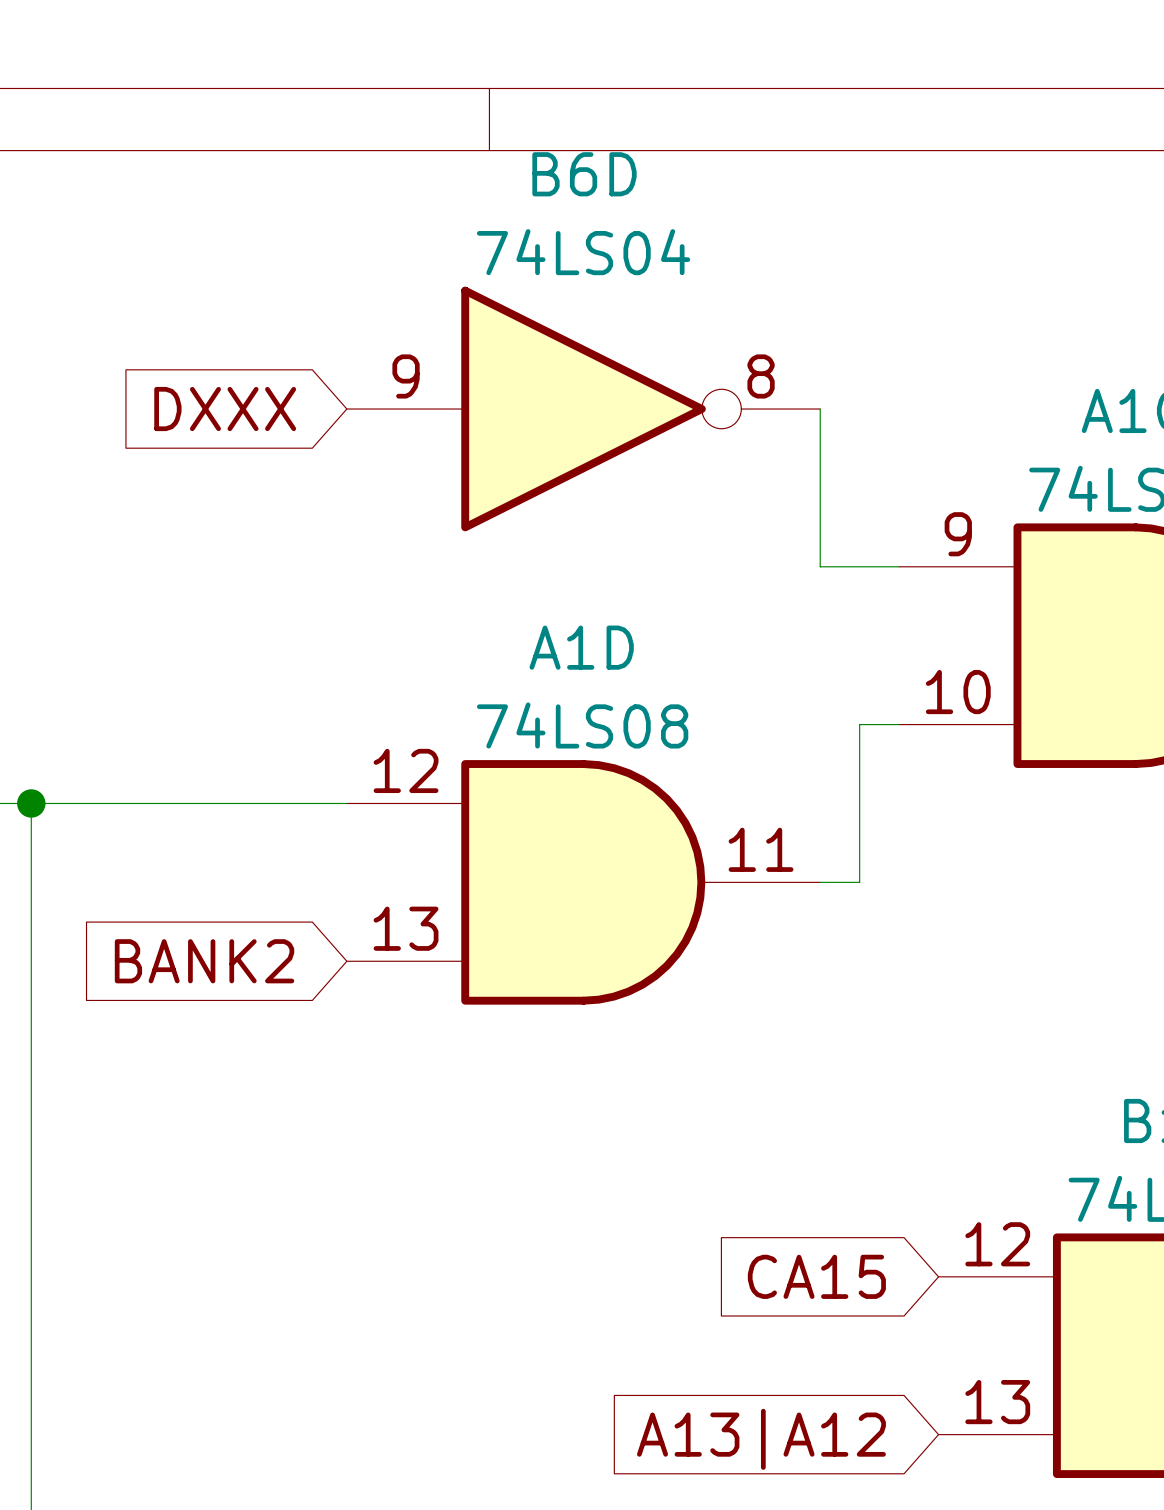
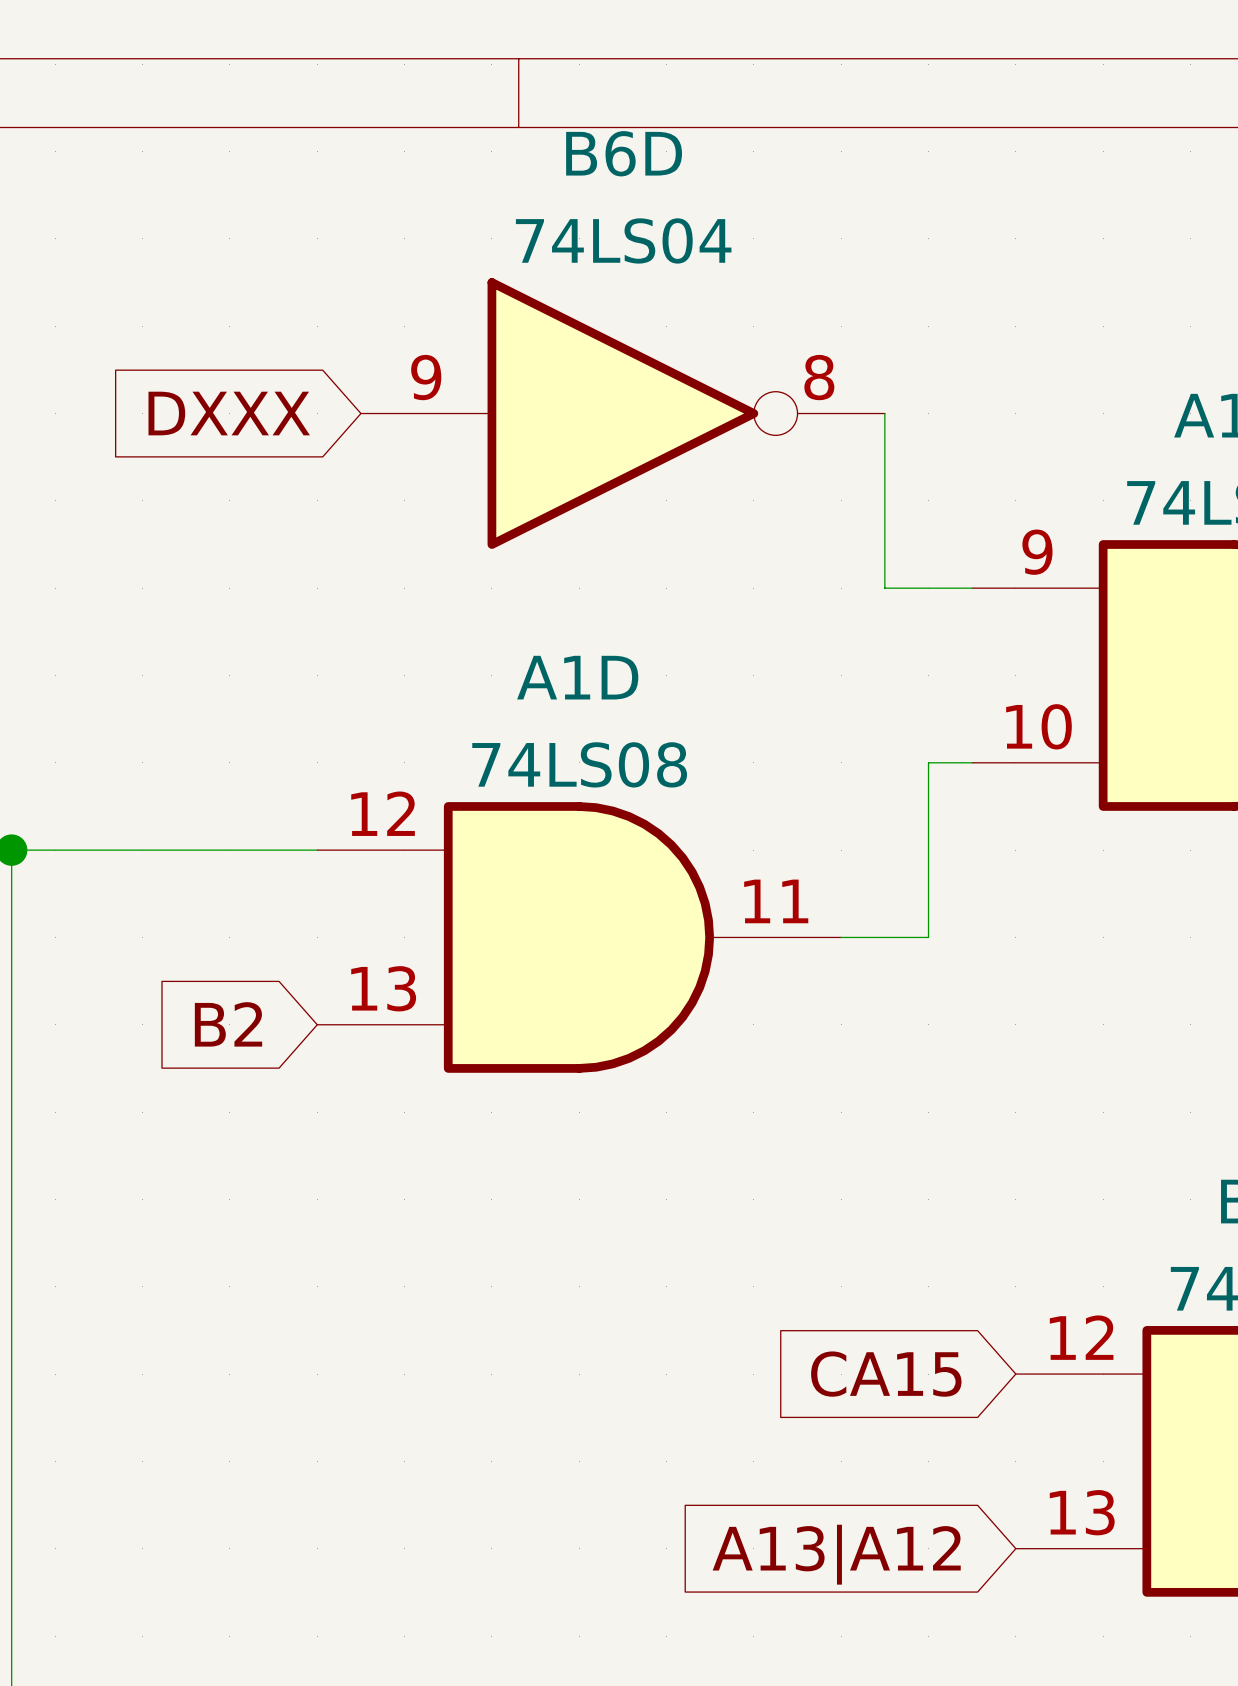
A1D position: (583, 882) -> (579, 937)
global label: BANK2 (204, 961) -> none
global label: none -> B2 (228, 1024)

